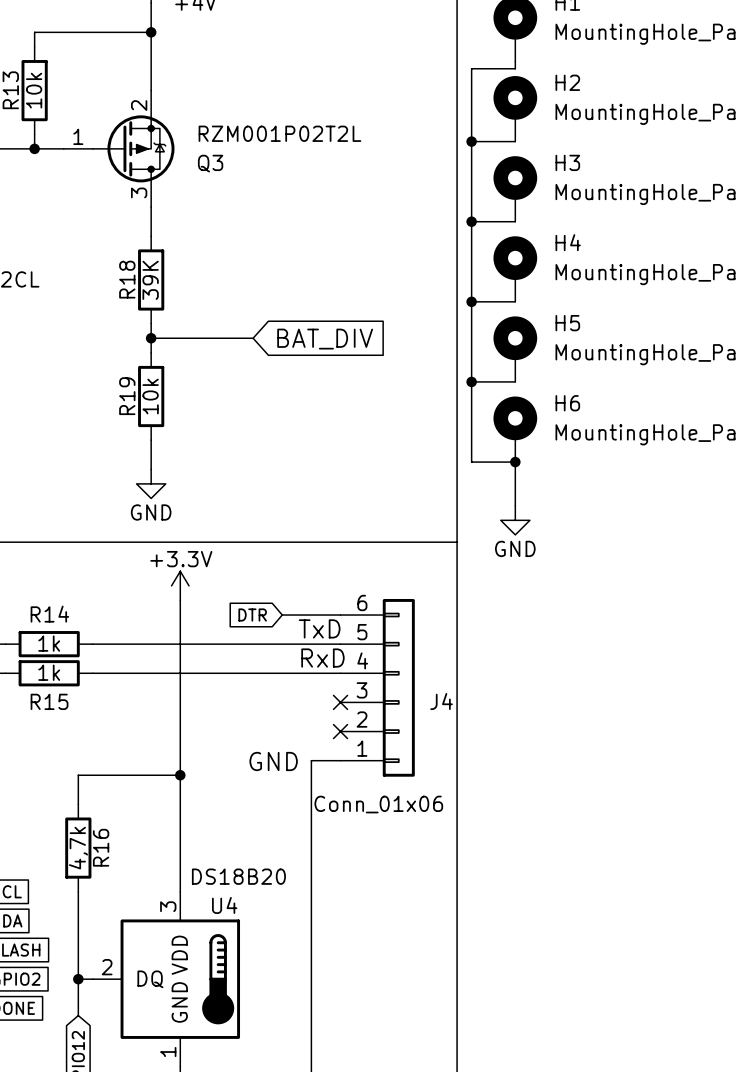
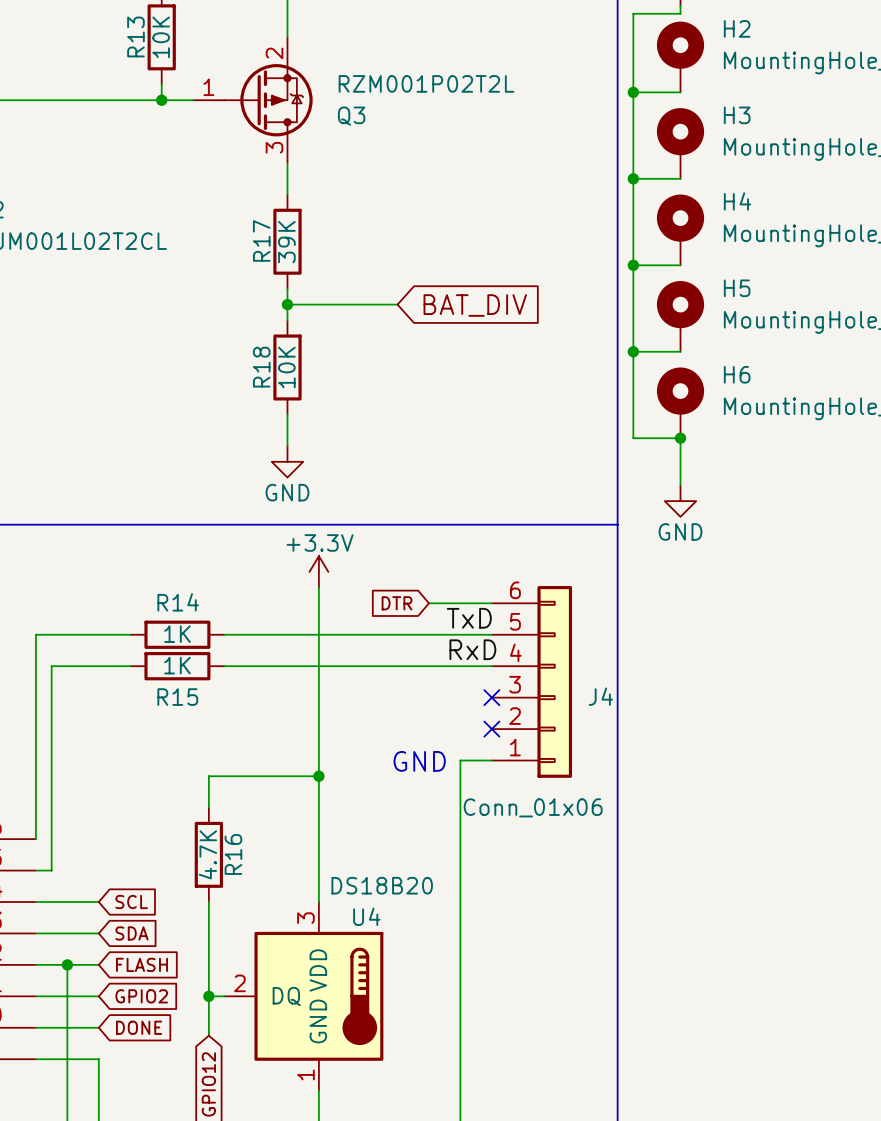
R13 value: 10k (34, 90) -> 10K (161, 37)
R18 name: R18 (127, 279) -> R17 (261, 240)
R19 name: R19 (127, 396) -> R18 (261, 367)
R19 value: 10k (150, 396) -> 10K (286, 367)
R14 value: 1k (49, 643) -> 1K (177, 634)
R15 value: 1k (49, 672) -> 1K (177, 665)
R16 value: 4,7k (78, 848) -> 4.7K (207, 854)

